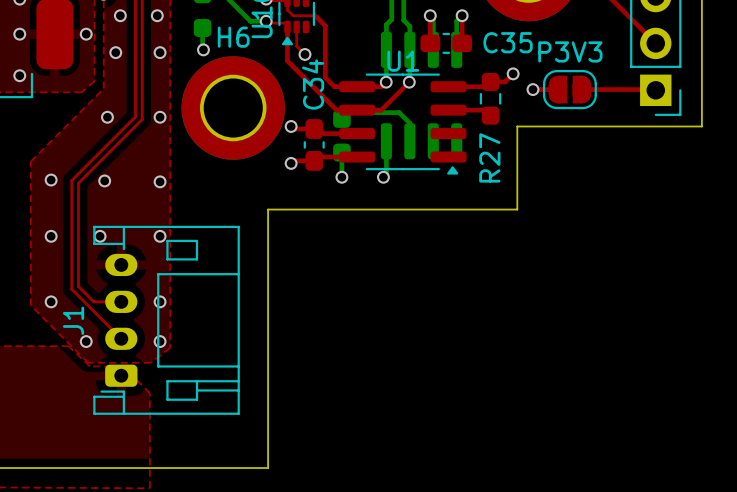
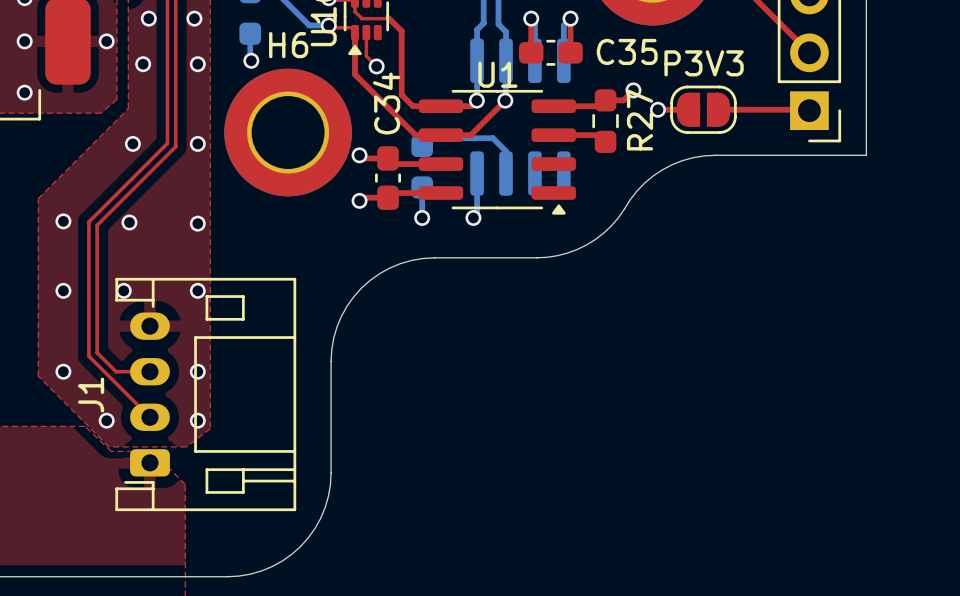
board edge: (579, 126) (517, 126) (517, 209) (434, 209) -> (715, 155) (682, 160) (662, 169) (636, 191) (618, 217) (595, 239) (567, 253) (536, 257)
R27 name position: R27 (489, 157) -> R27 (640, 120)
board edge: (351, 209) (268, 209) (268, 293) -> (434, 257) (400, 263) (379, 273) (361, 288) (346, 306) (336, 327) (331, 361)
board edge: (268, 384) (268, 468) (184, 468) -> (331, 473) (328, 496) (320, 518) (300, 546) (282, 560) (261, 570) (227, 576)

